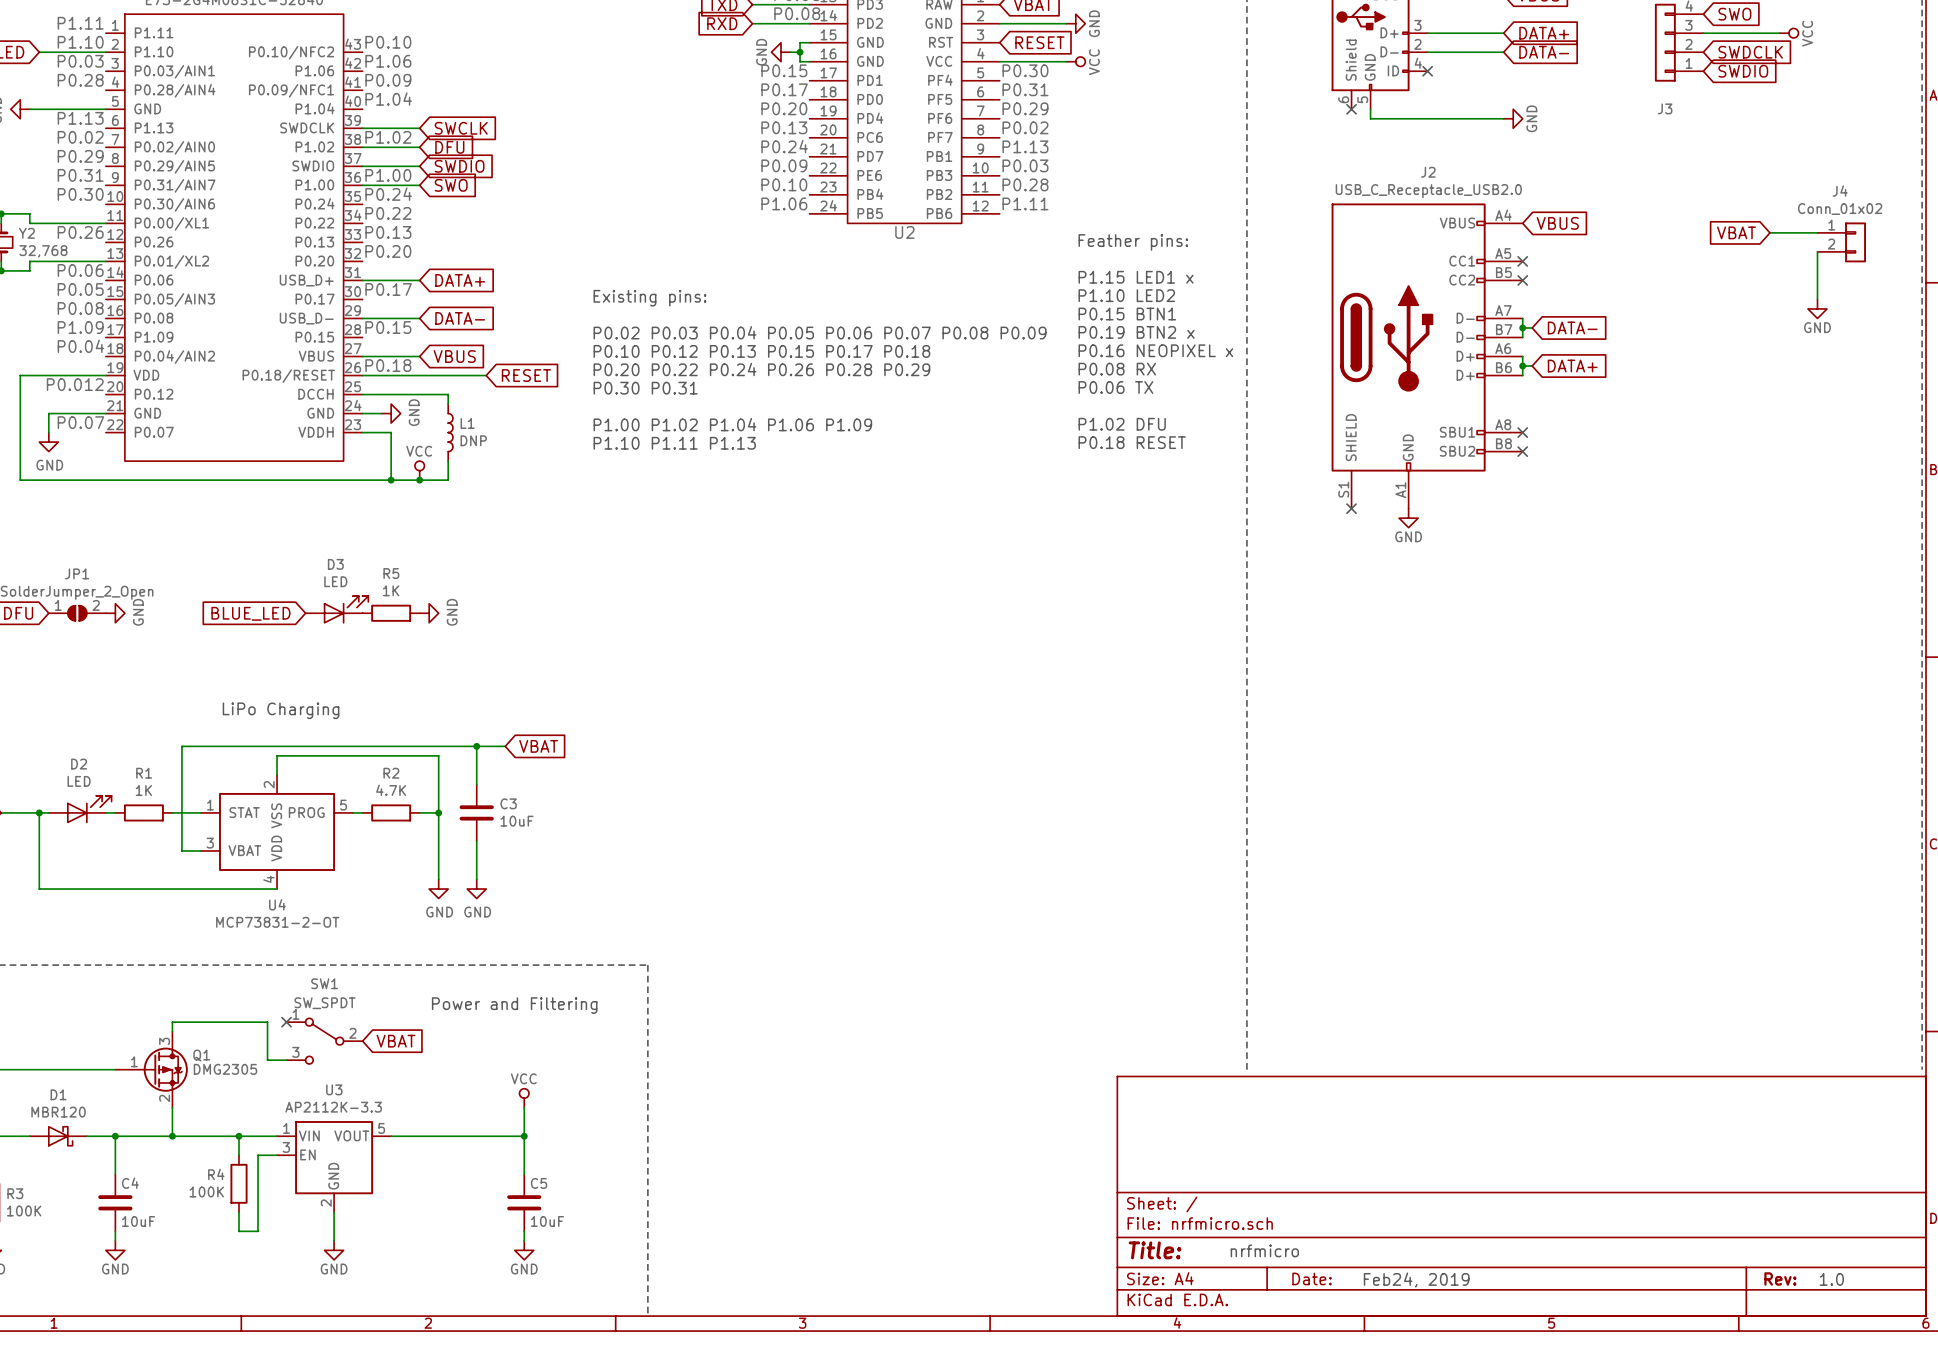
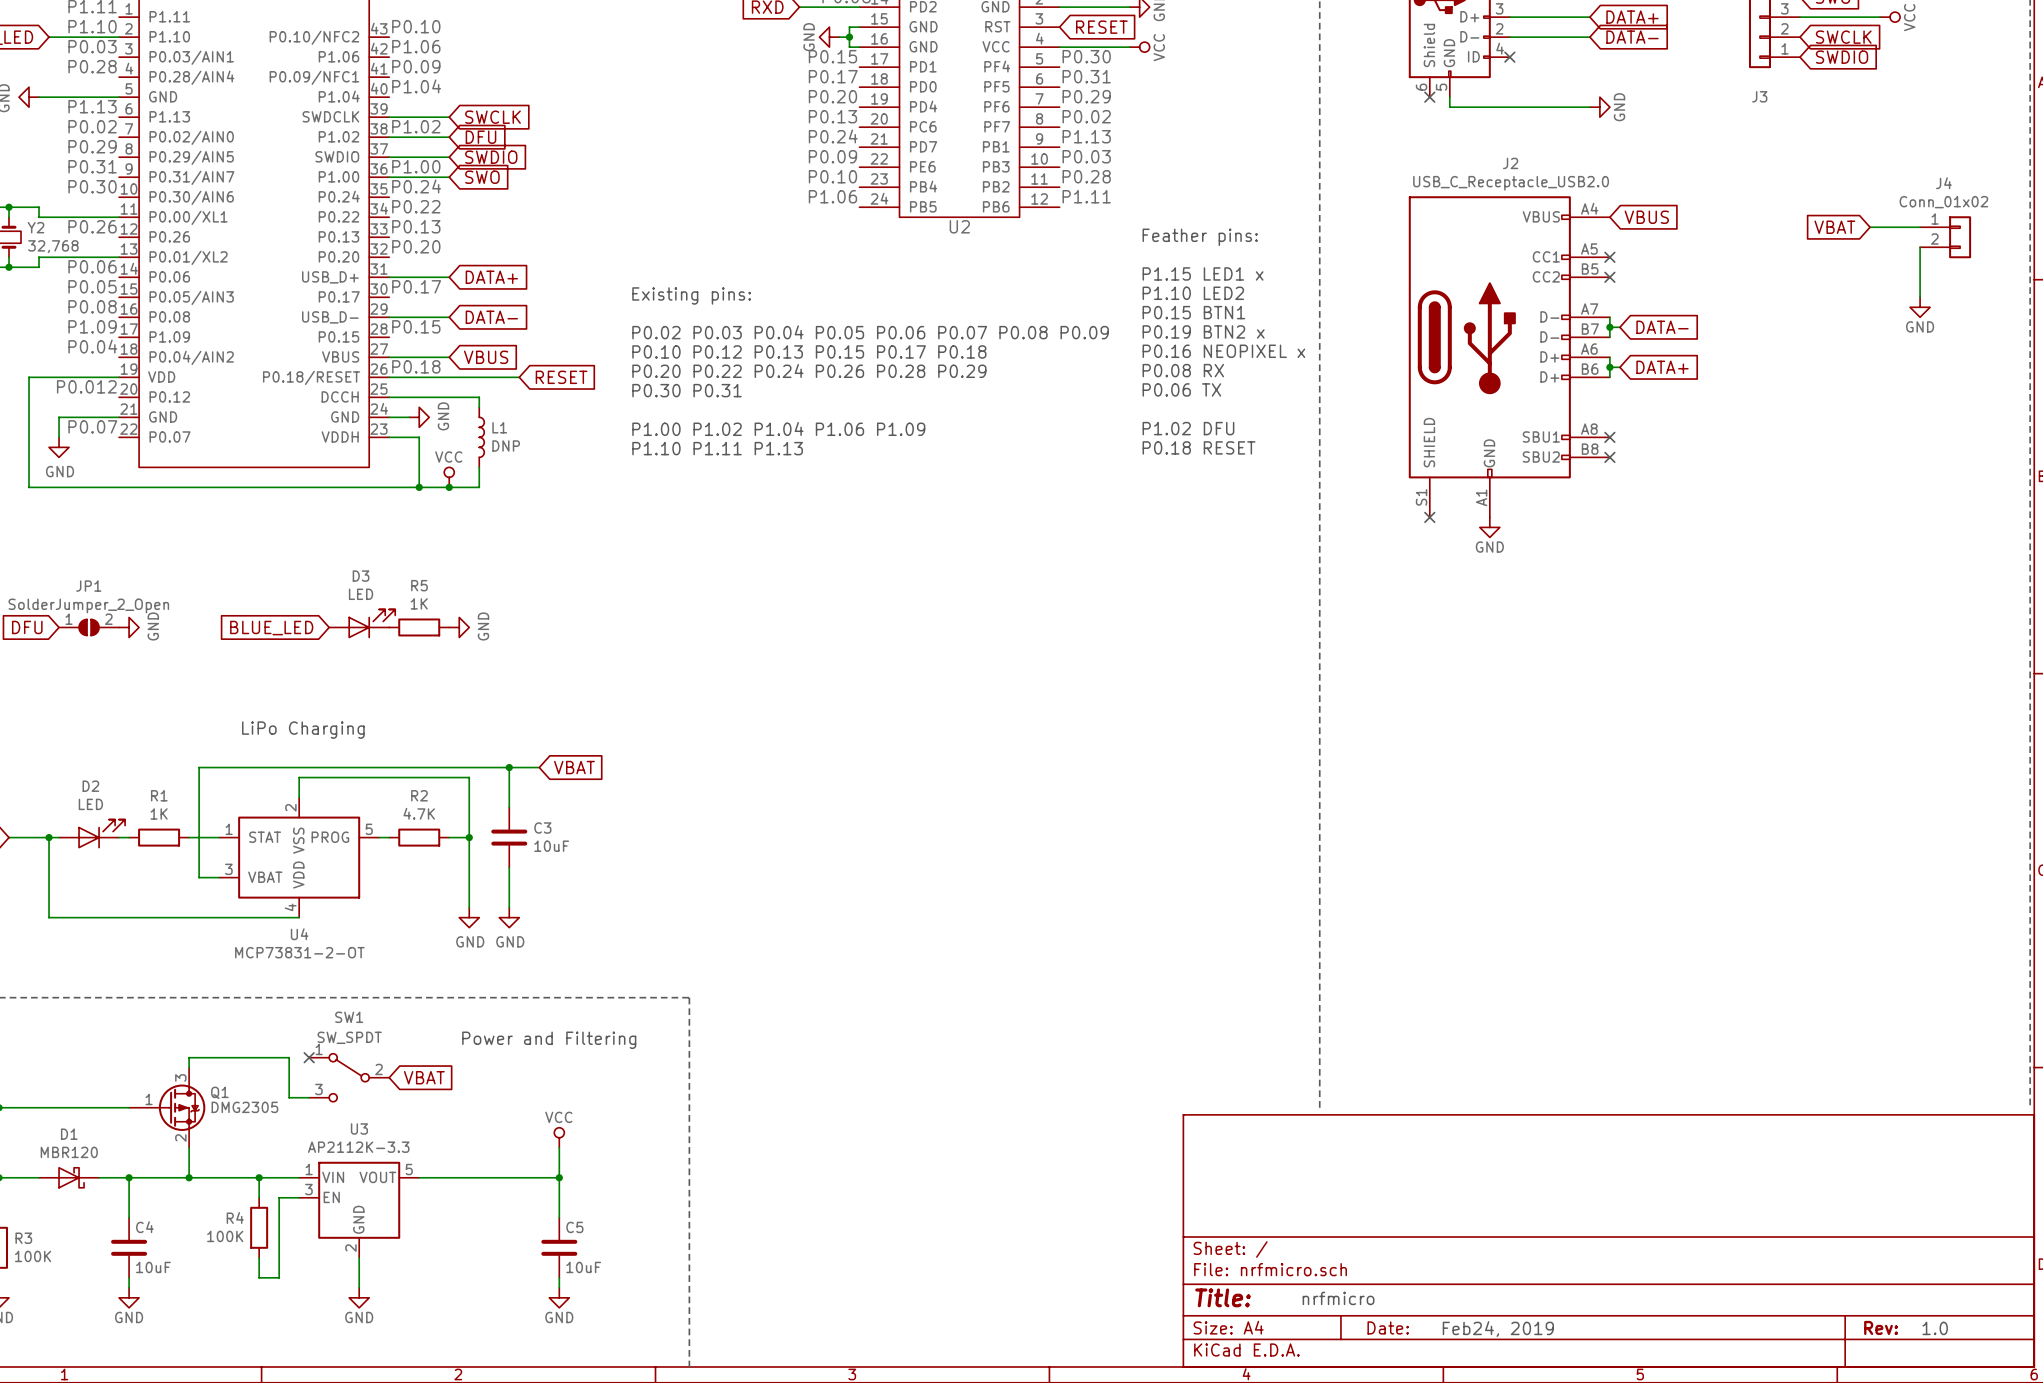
global label: SWDCLK (1750, 52) -> SWCLK (1843, 37)

